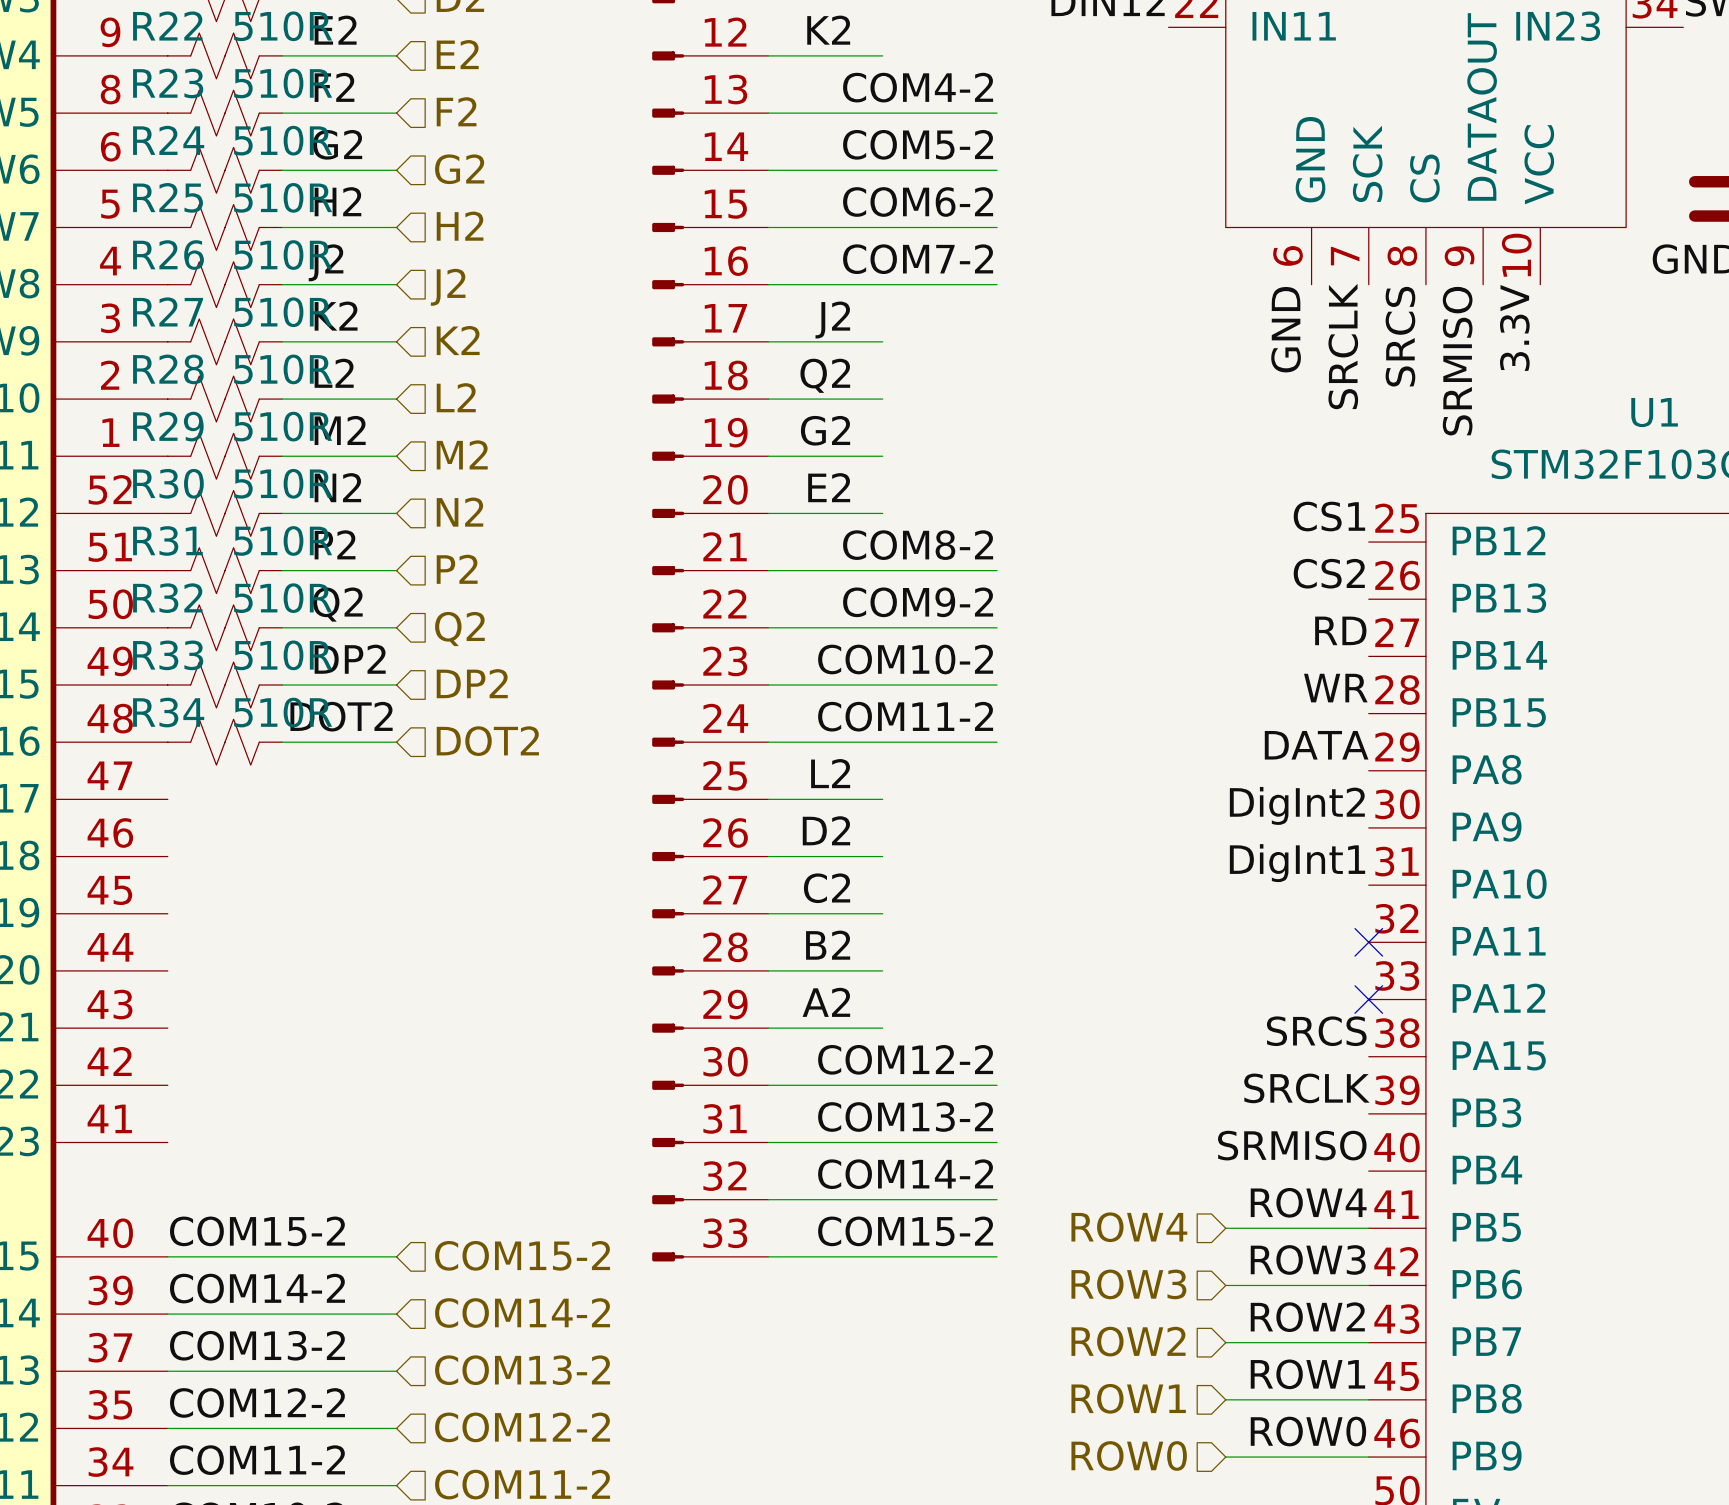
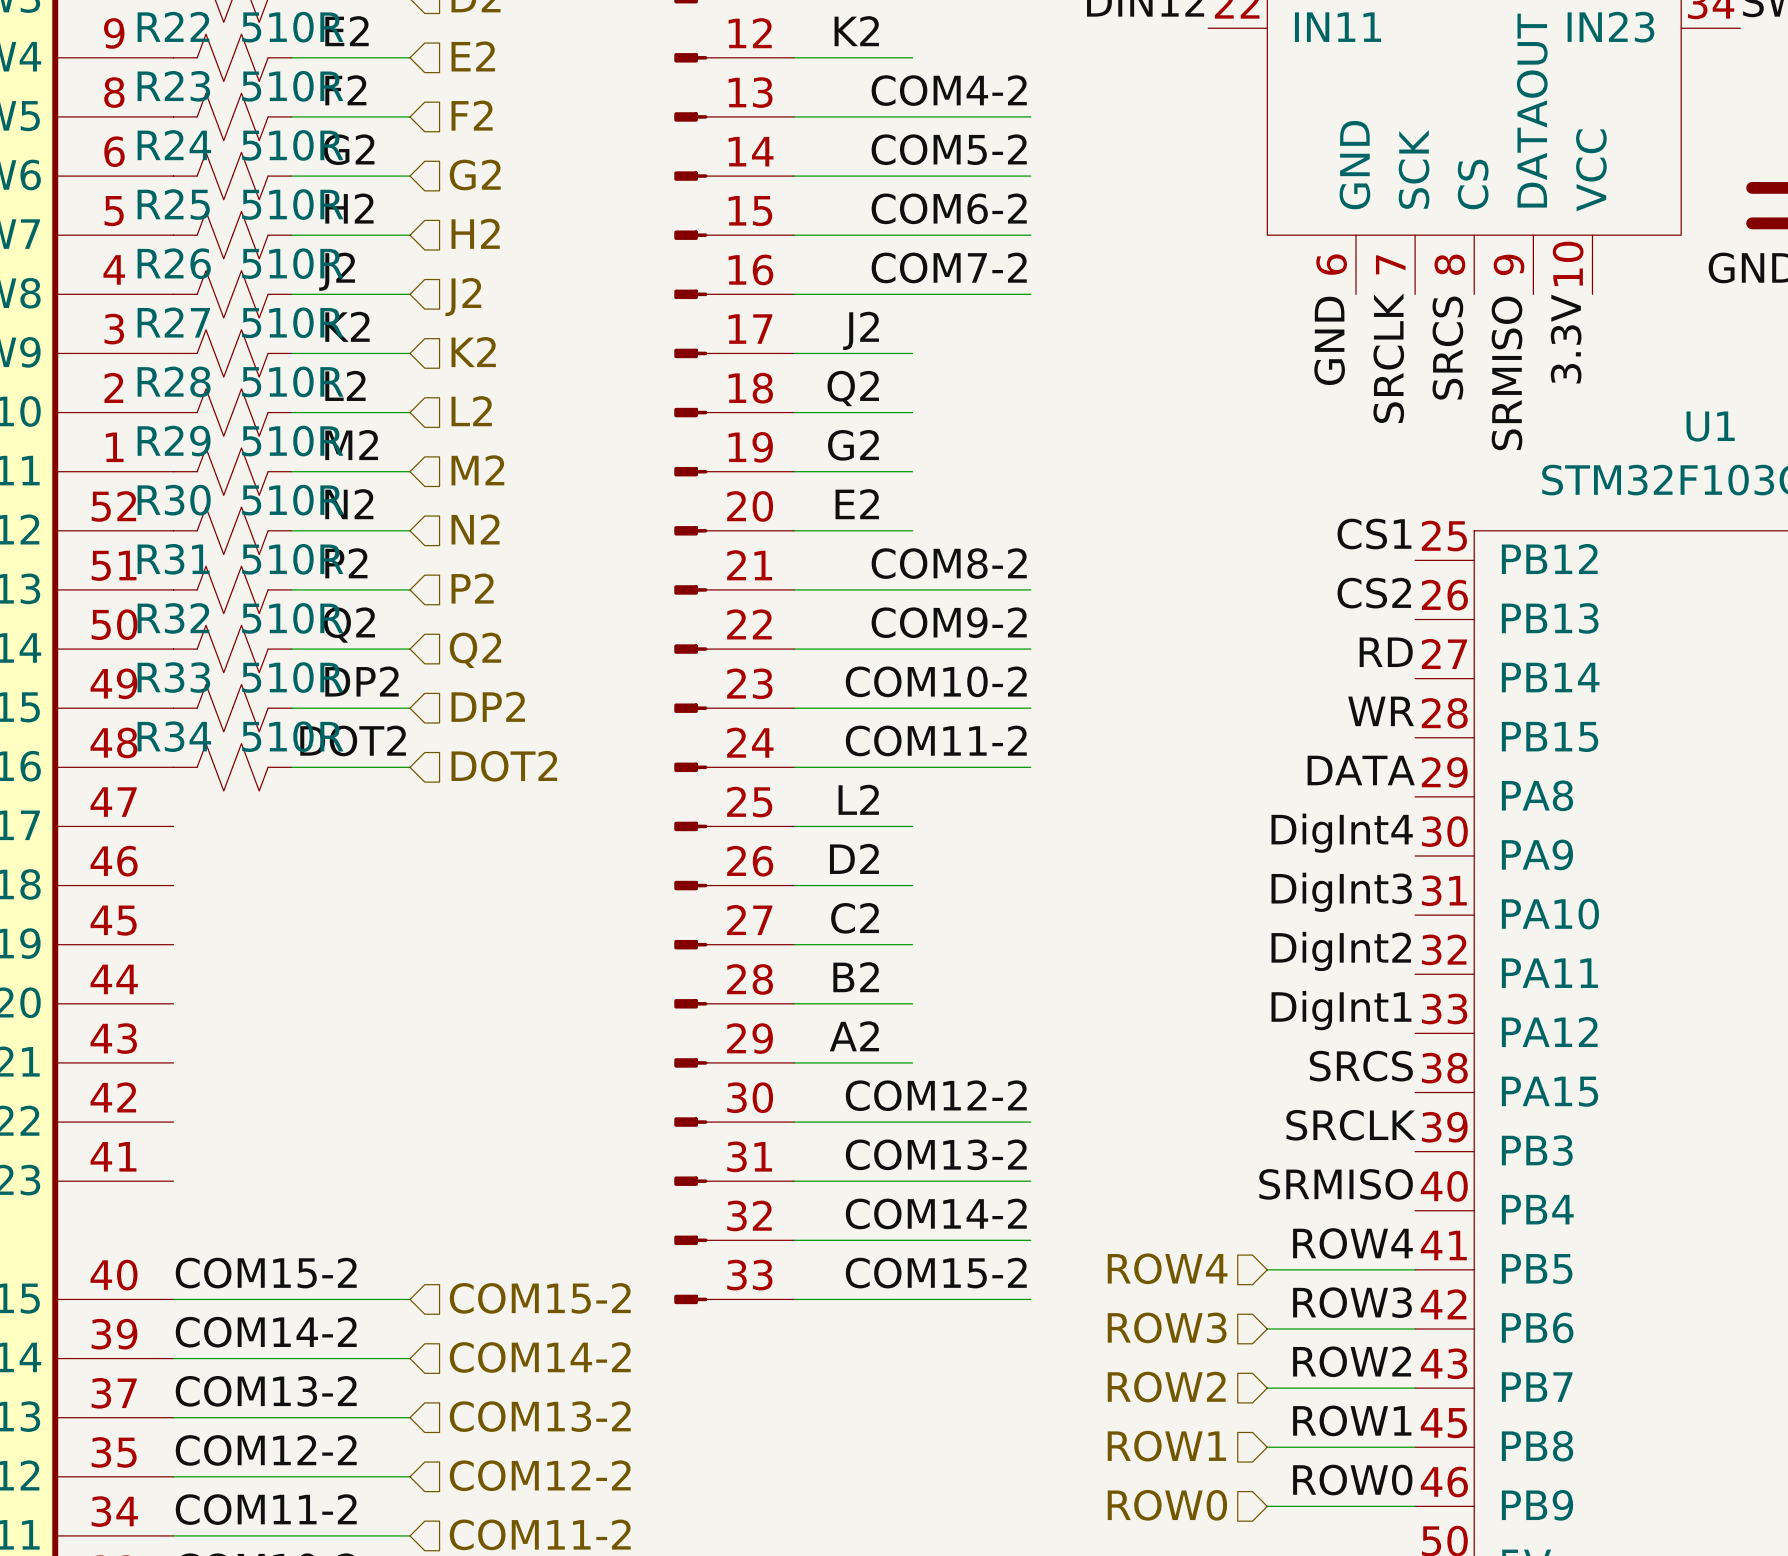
label: DigInt2 (1297, 805) -> DigInt4 (1342, 833)
label: DigInt1 (1297, 863) -> DigInt3 (1341, 892)
label: none -> DigInt2 (1341, 951)
no-connect mark: (1368, 942) -> none
label: none -> DigInt1 (1341, 1010)
no-connect mark: (1368, 999) -> none

